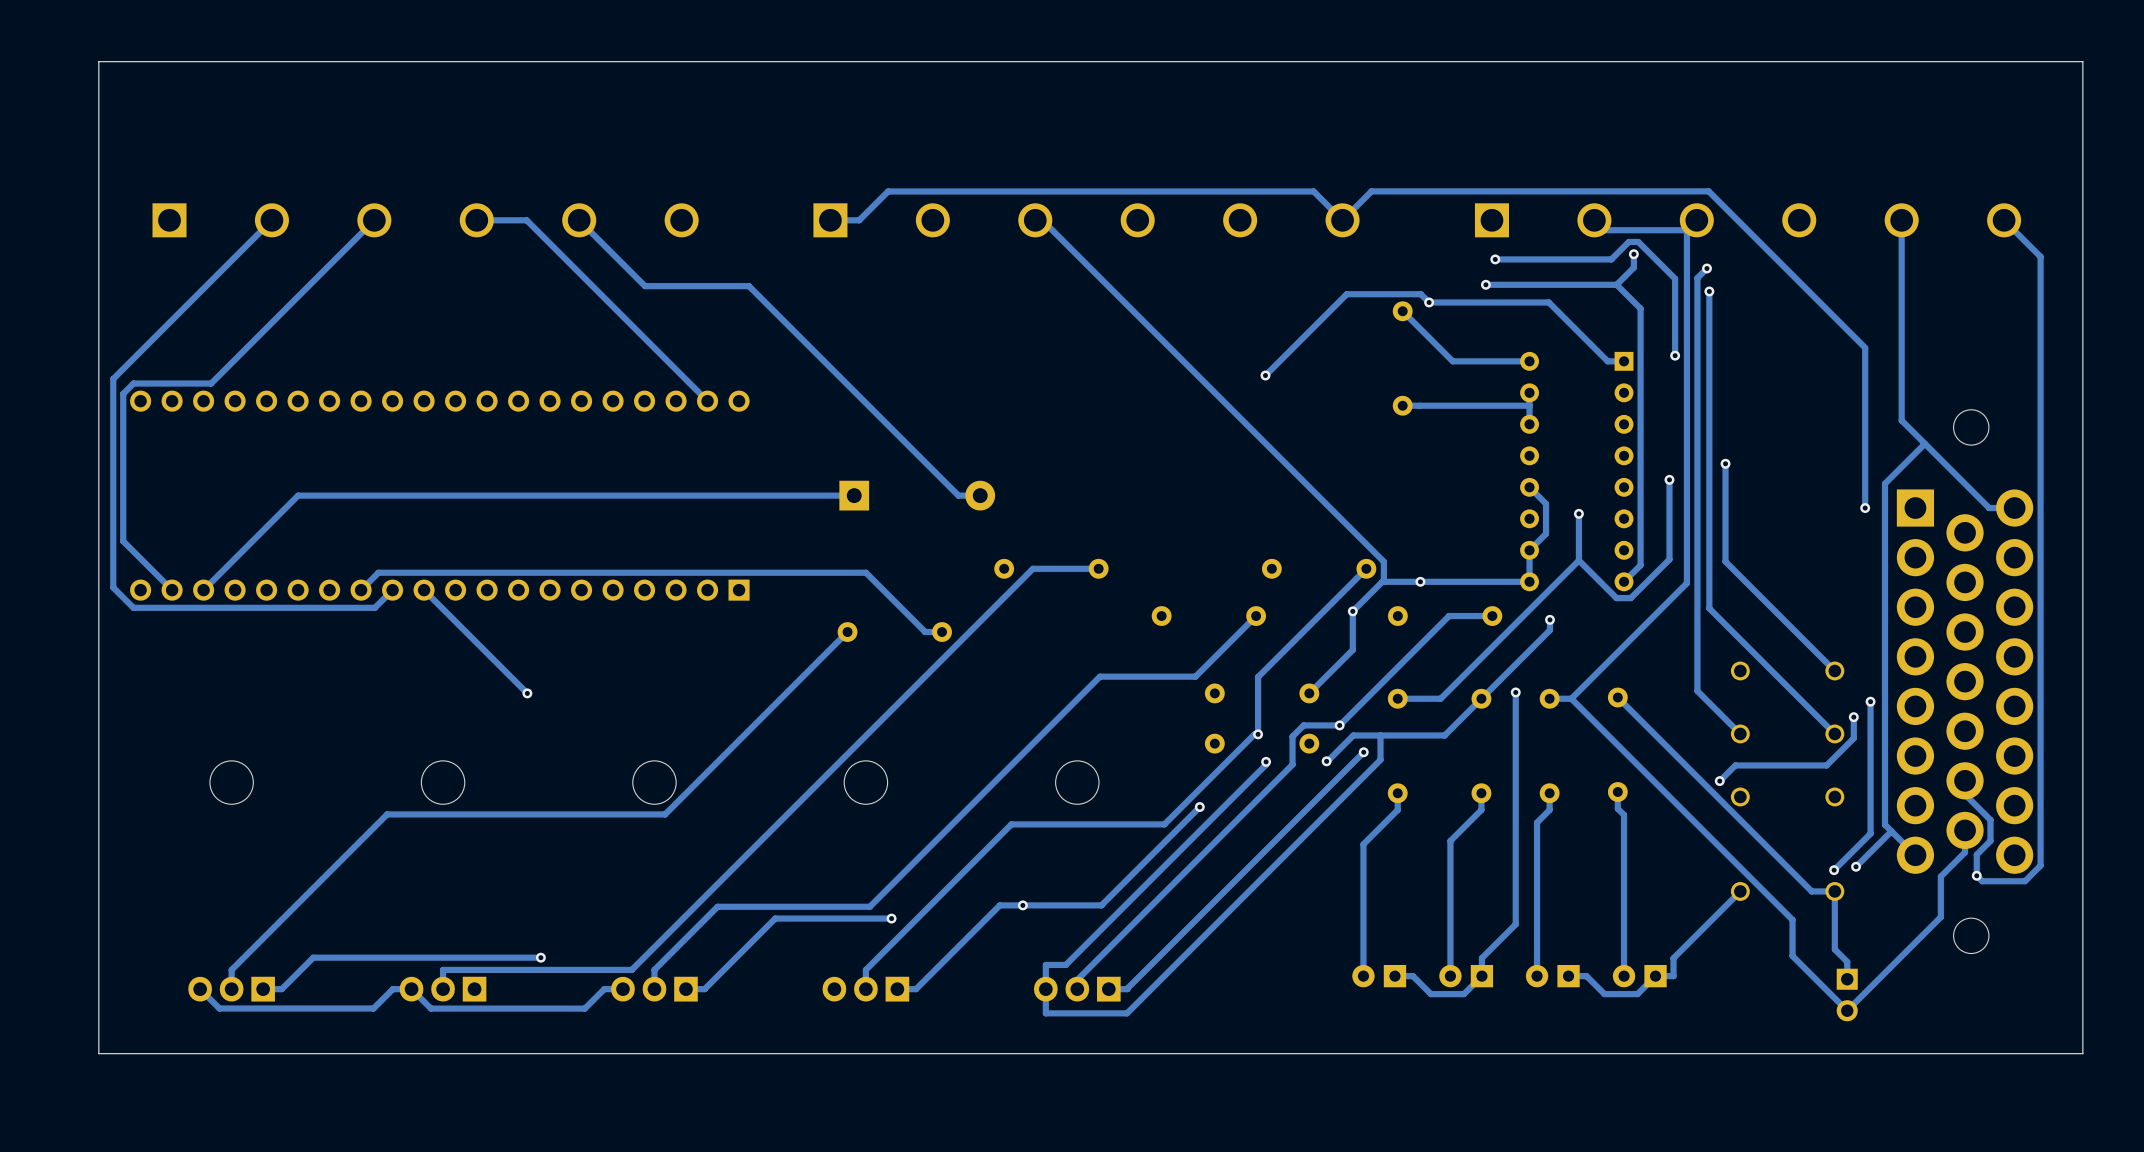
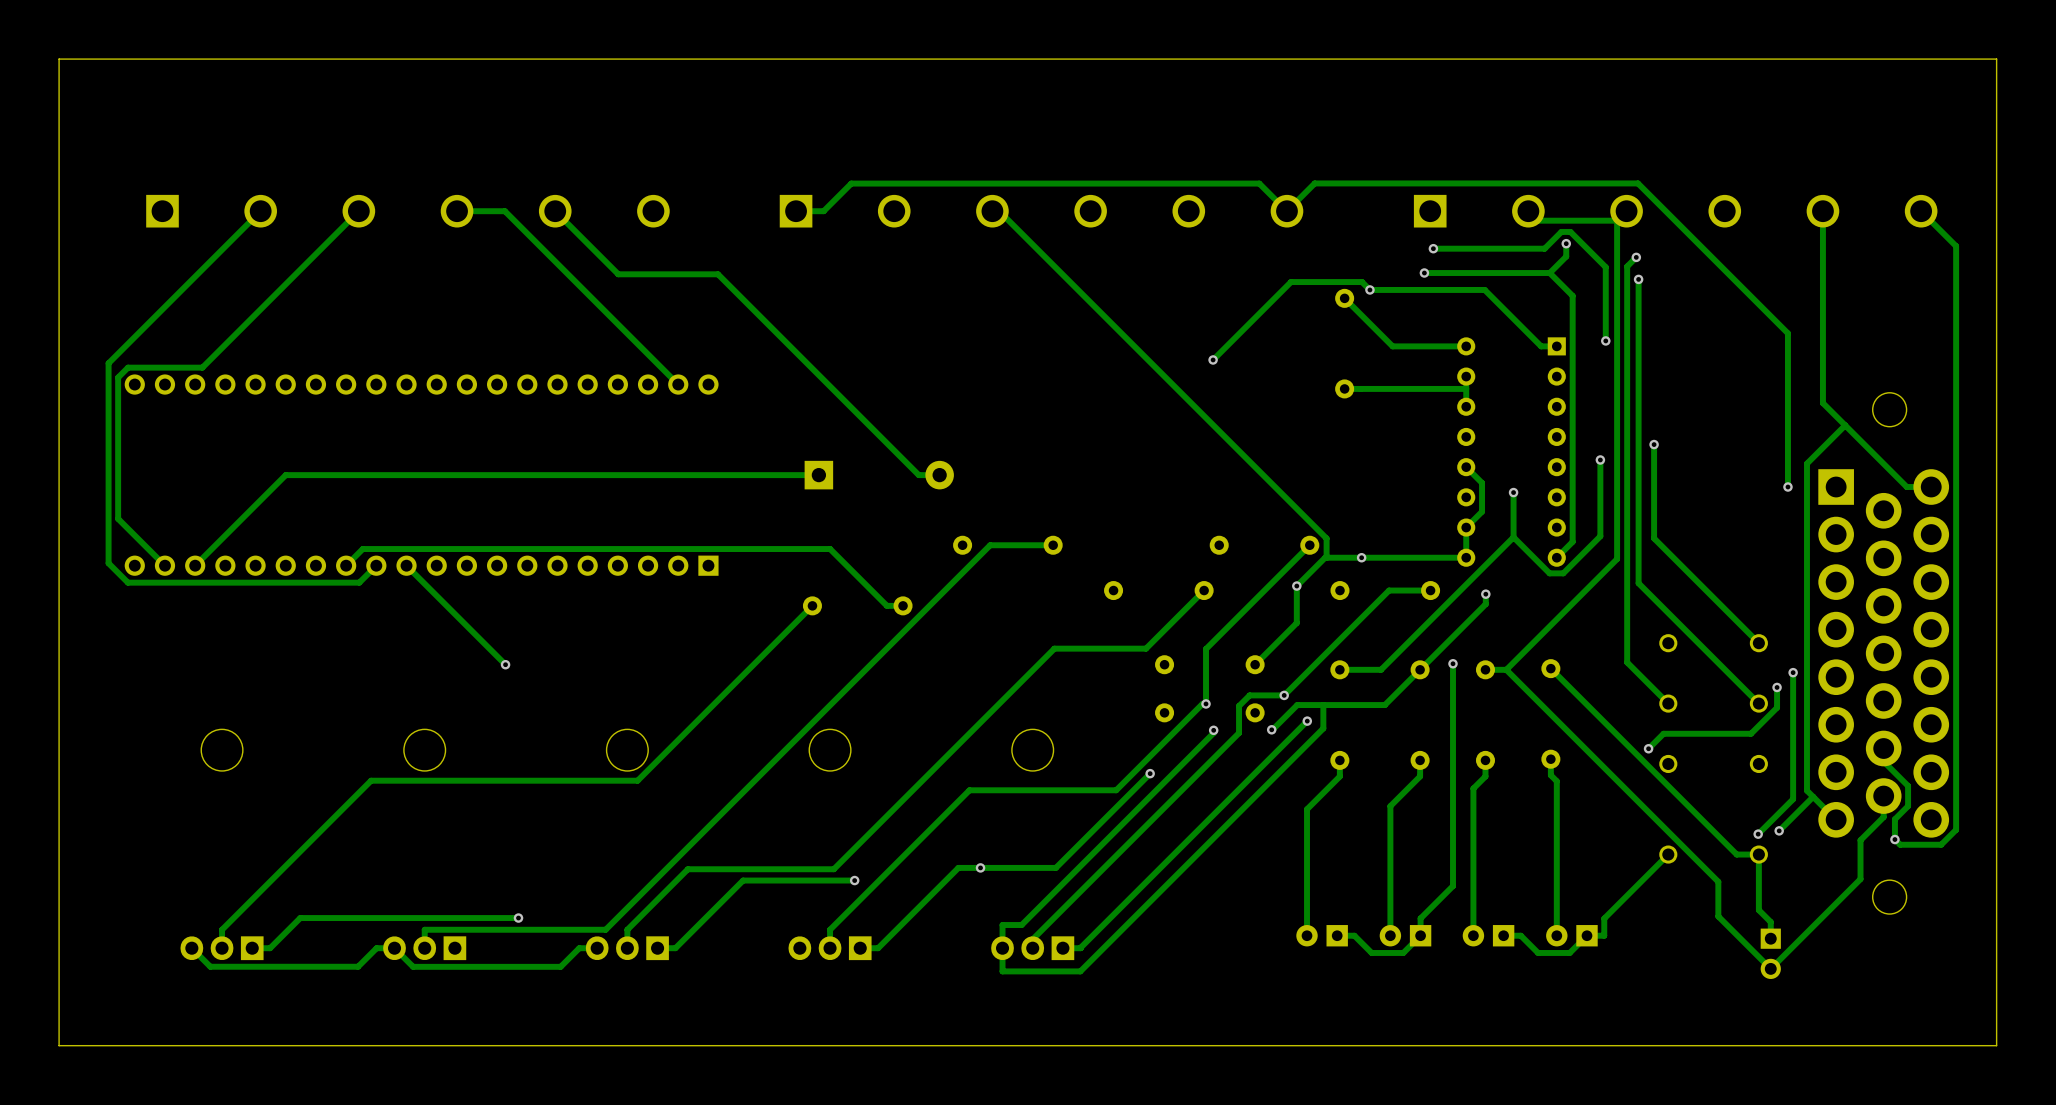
board edge: (98, 61) (98, 1053) (2082, 1053) -> (94, 59) (59, 59) (59, 1045) (1996, 1045) (1996, 1010)

